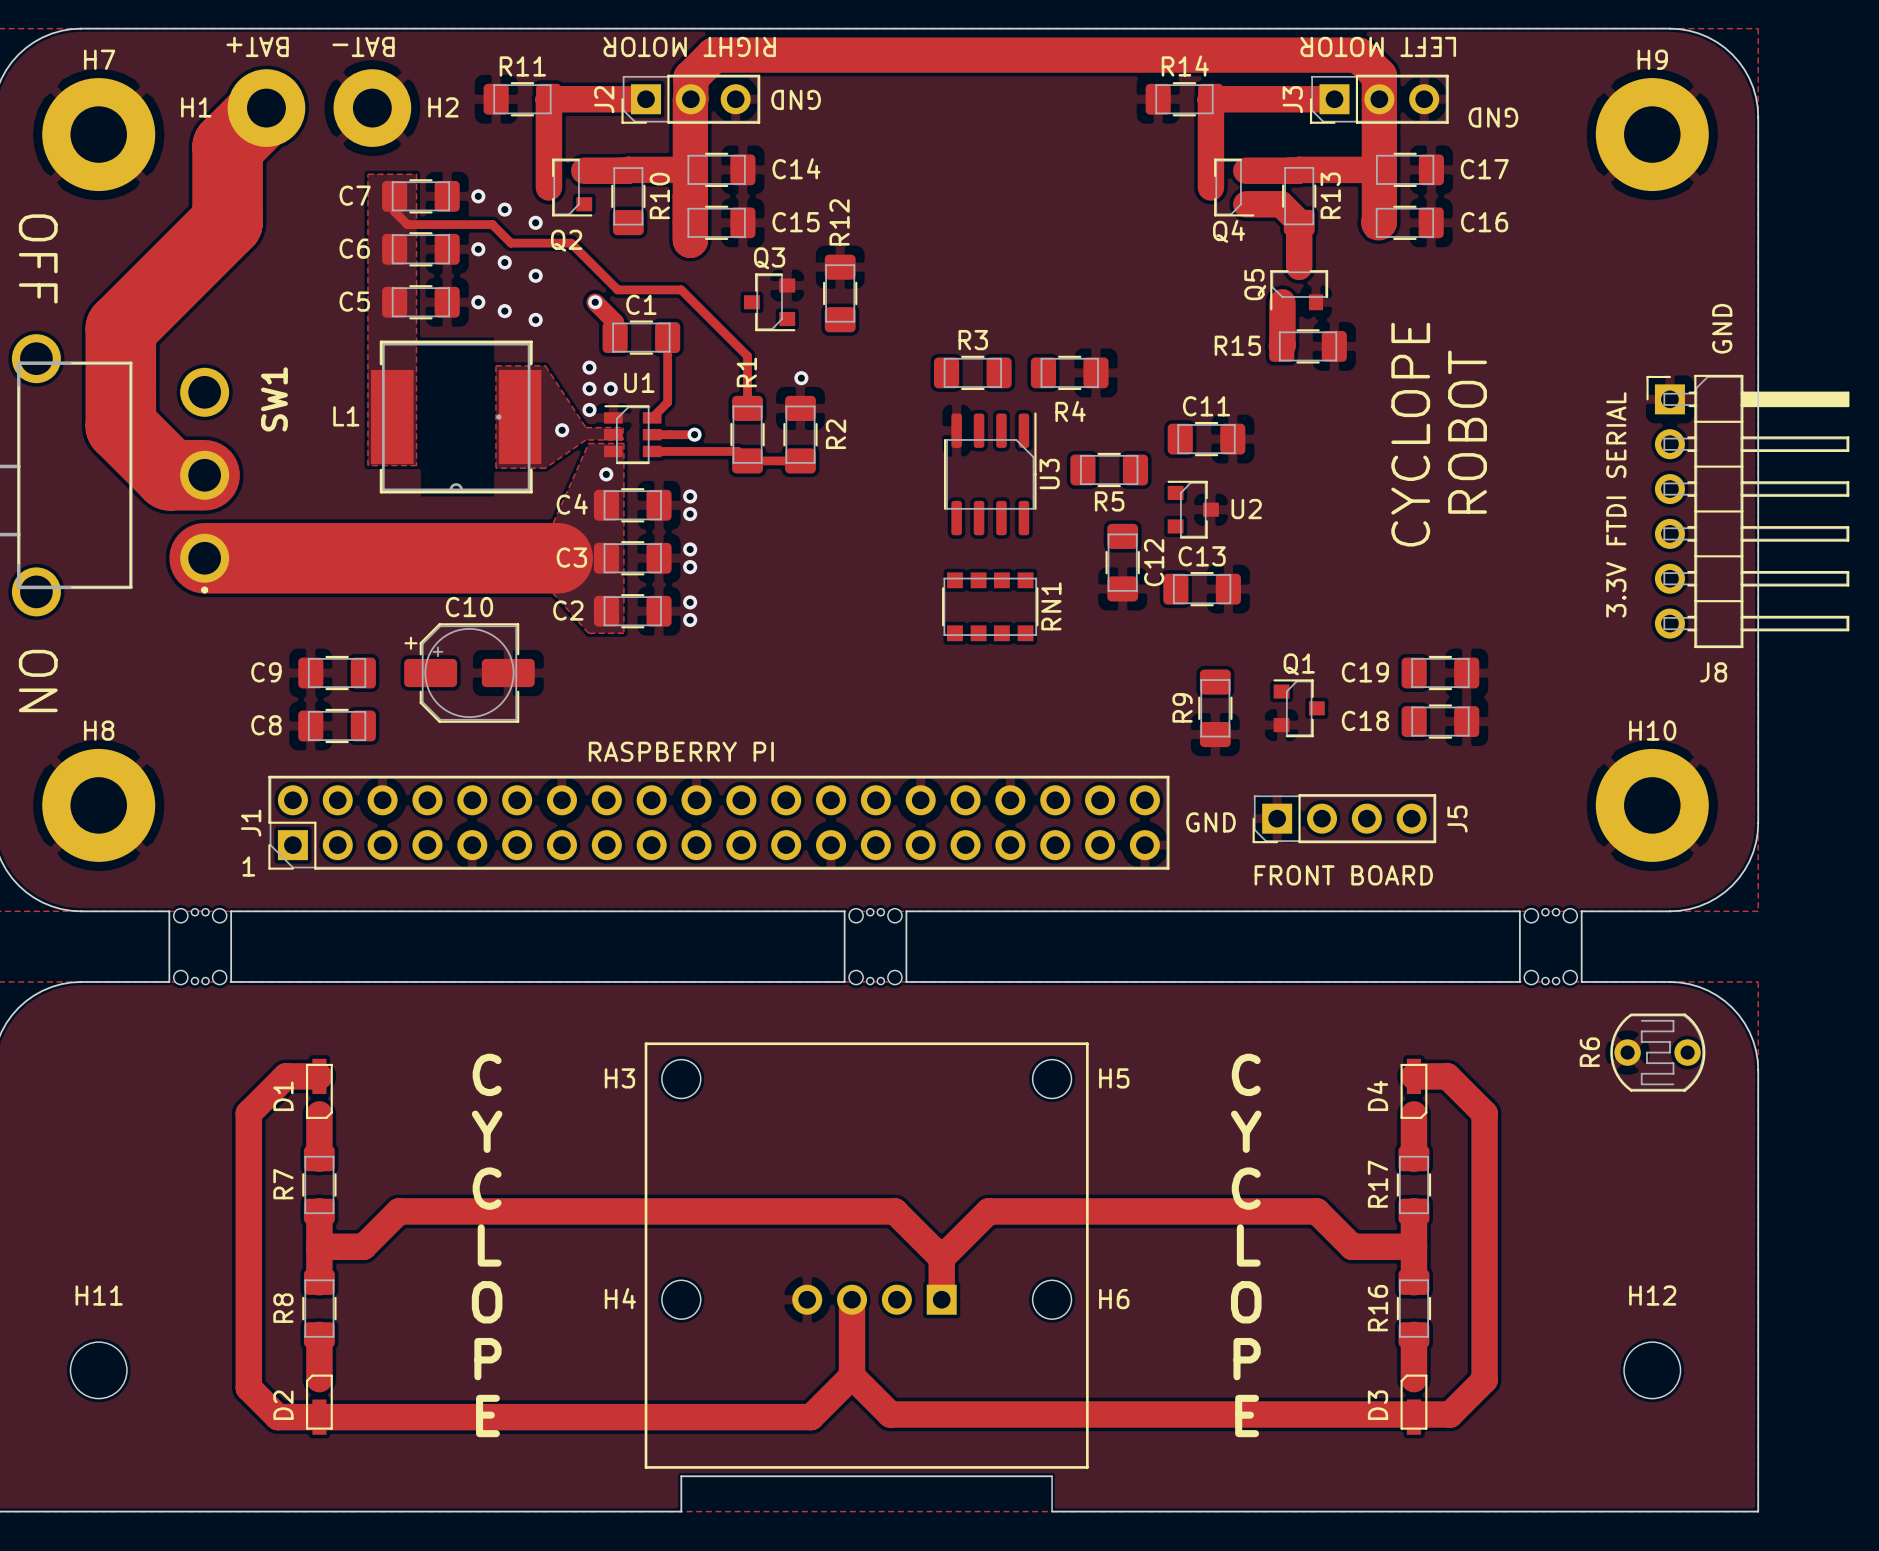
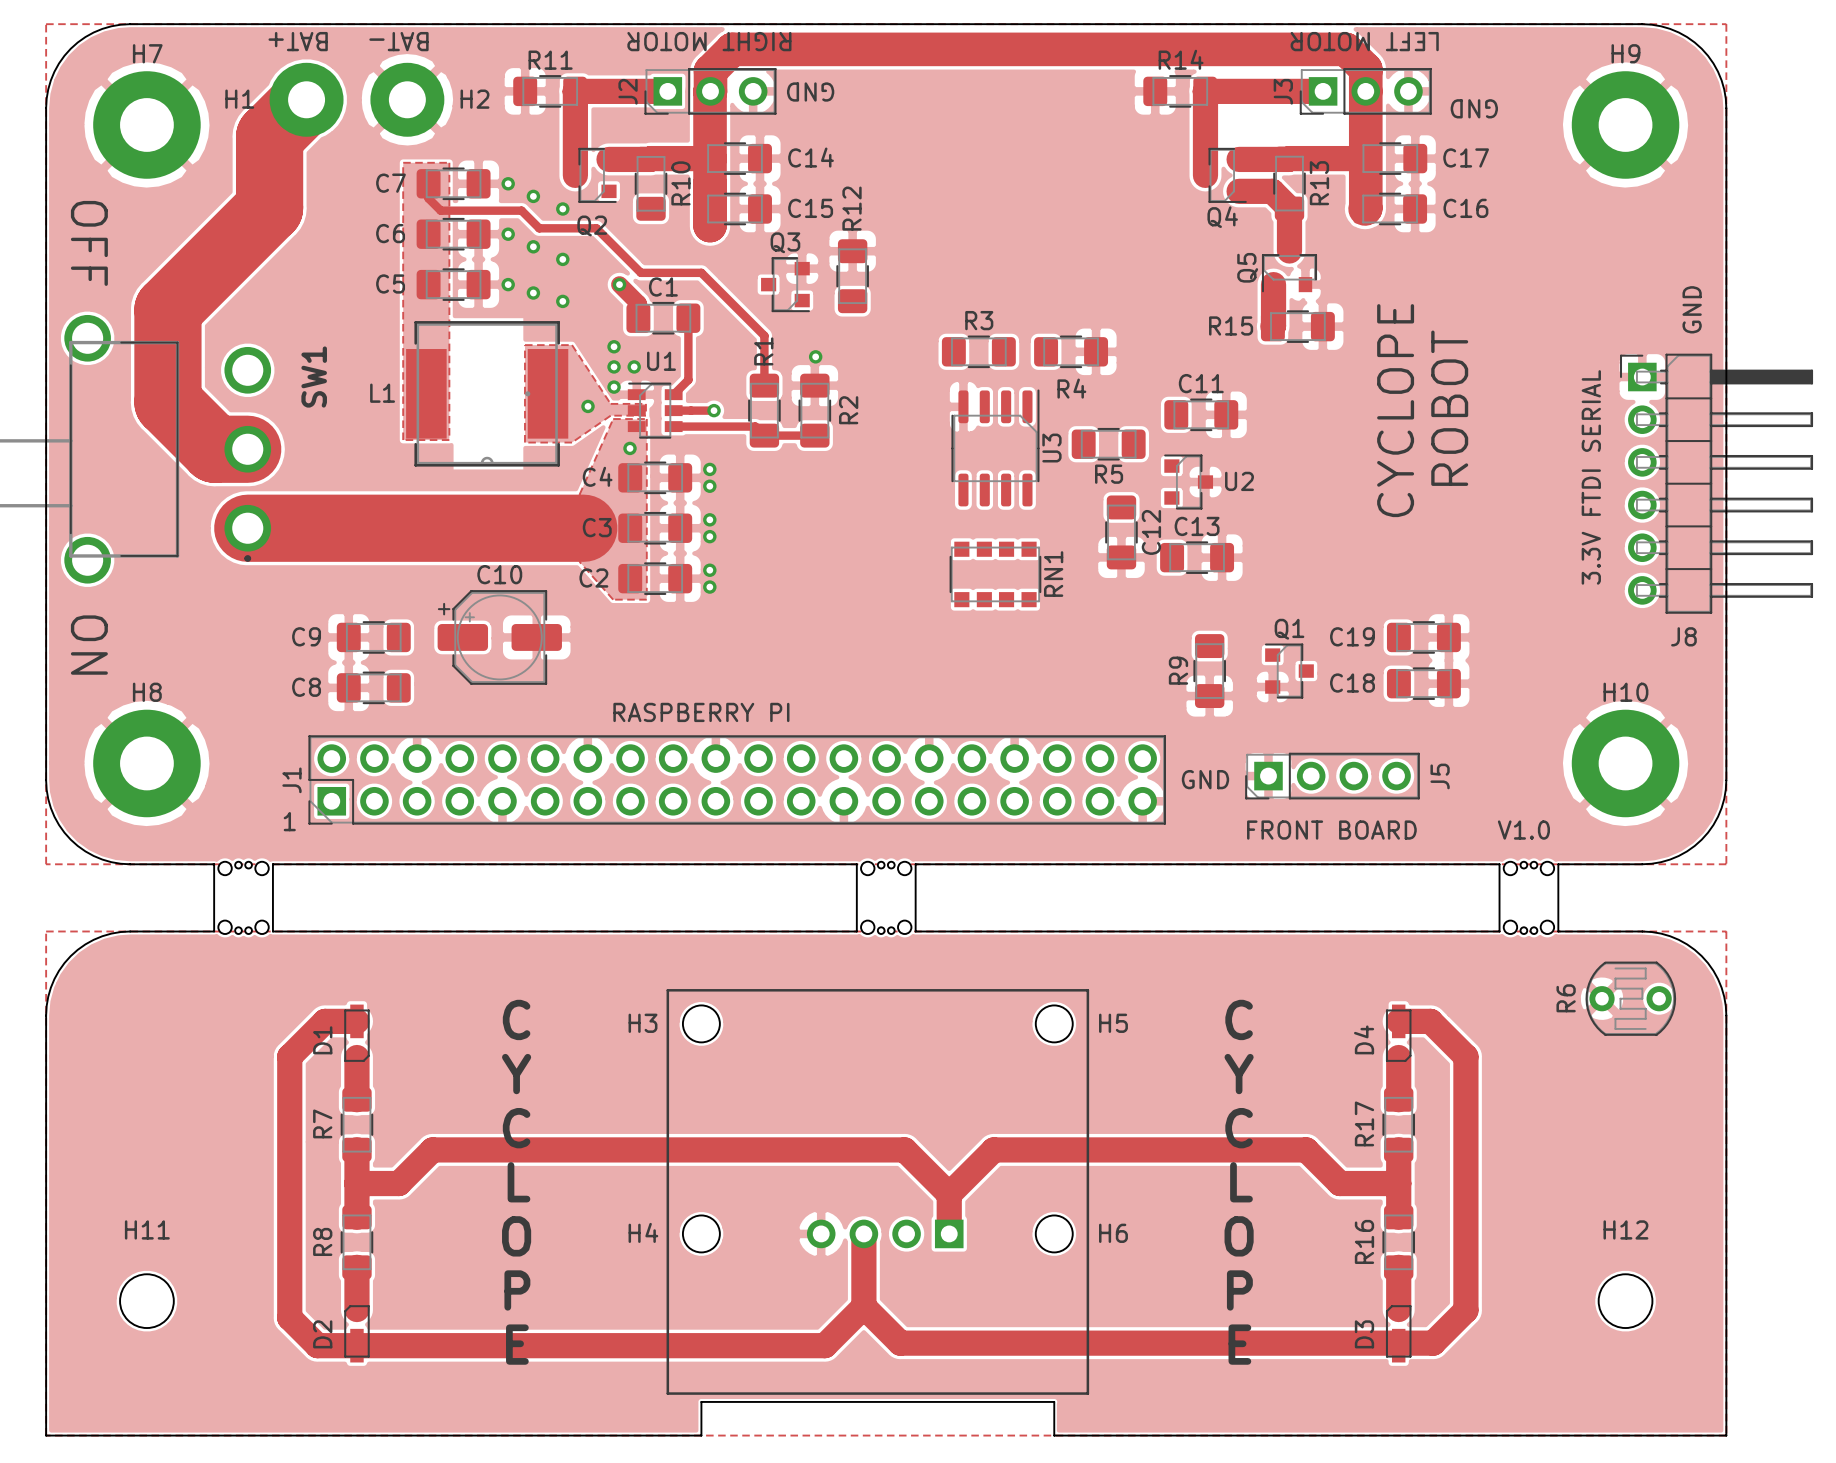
text: none -> V1.0 (1523, 830)

